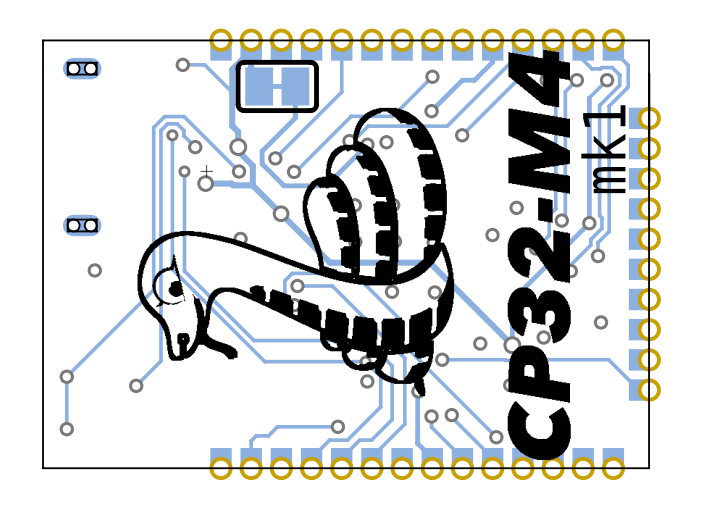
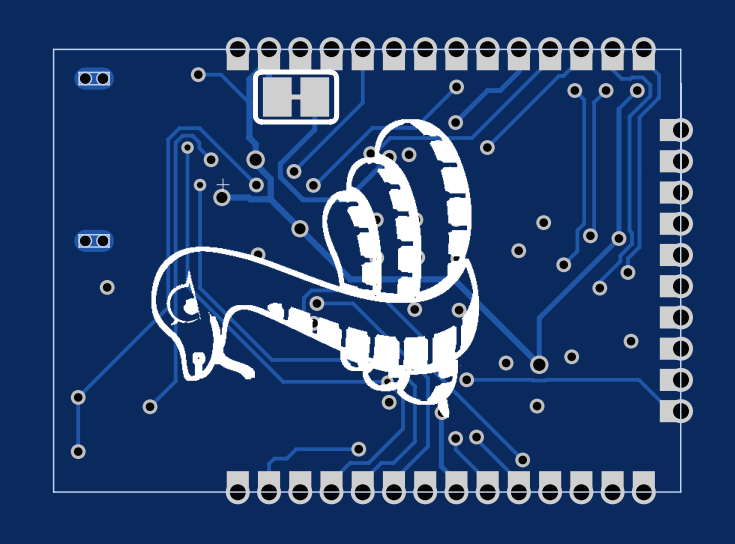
drawing: [507, 49, 571, 460] -> none
text: mk1 (603, 149) -> none

